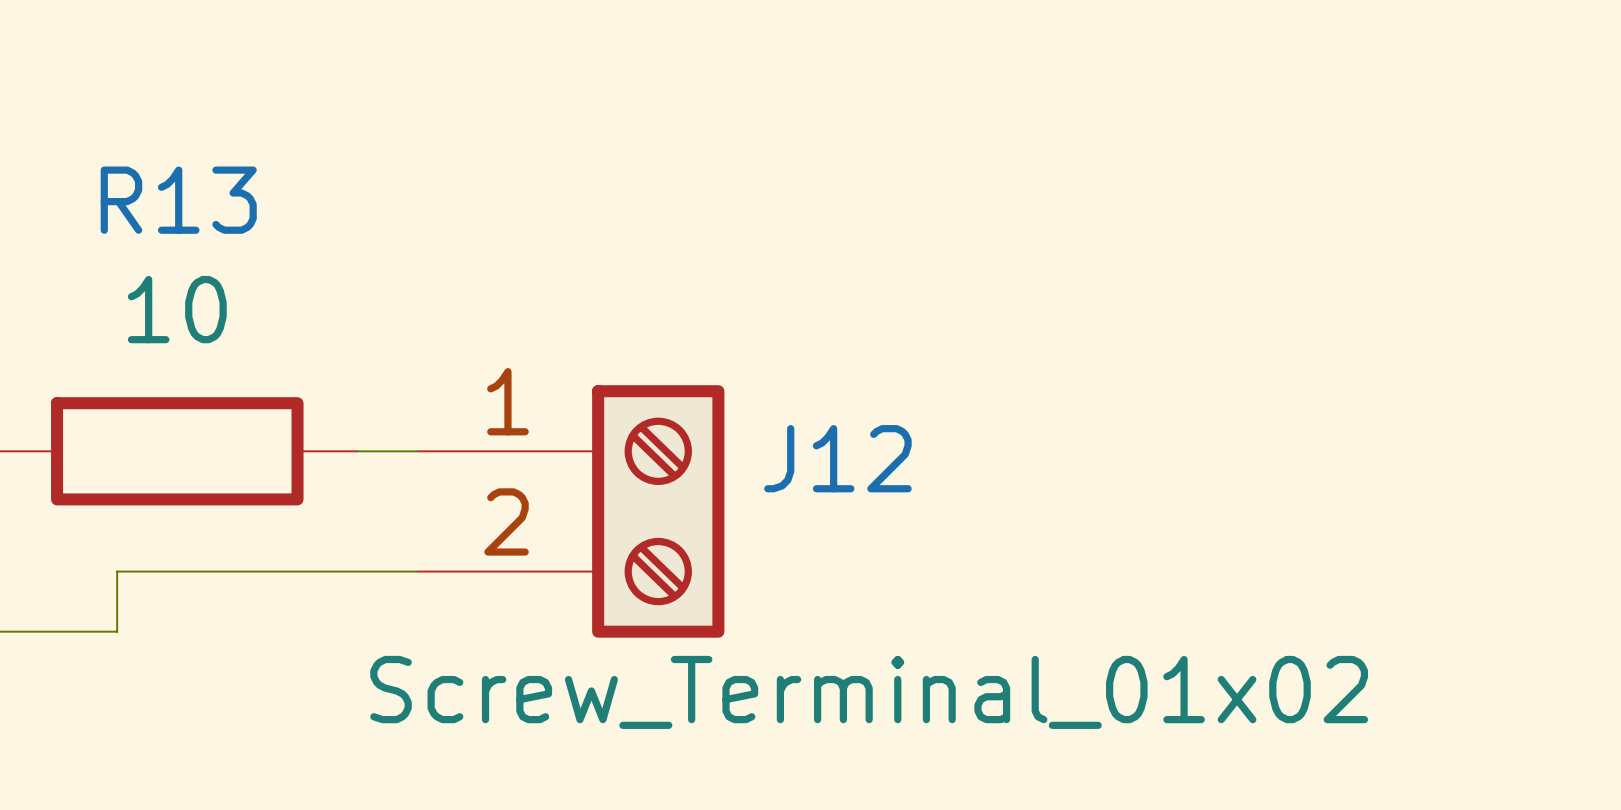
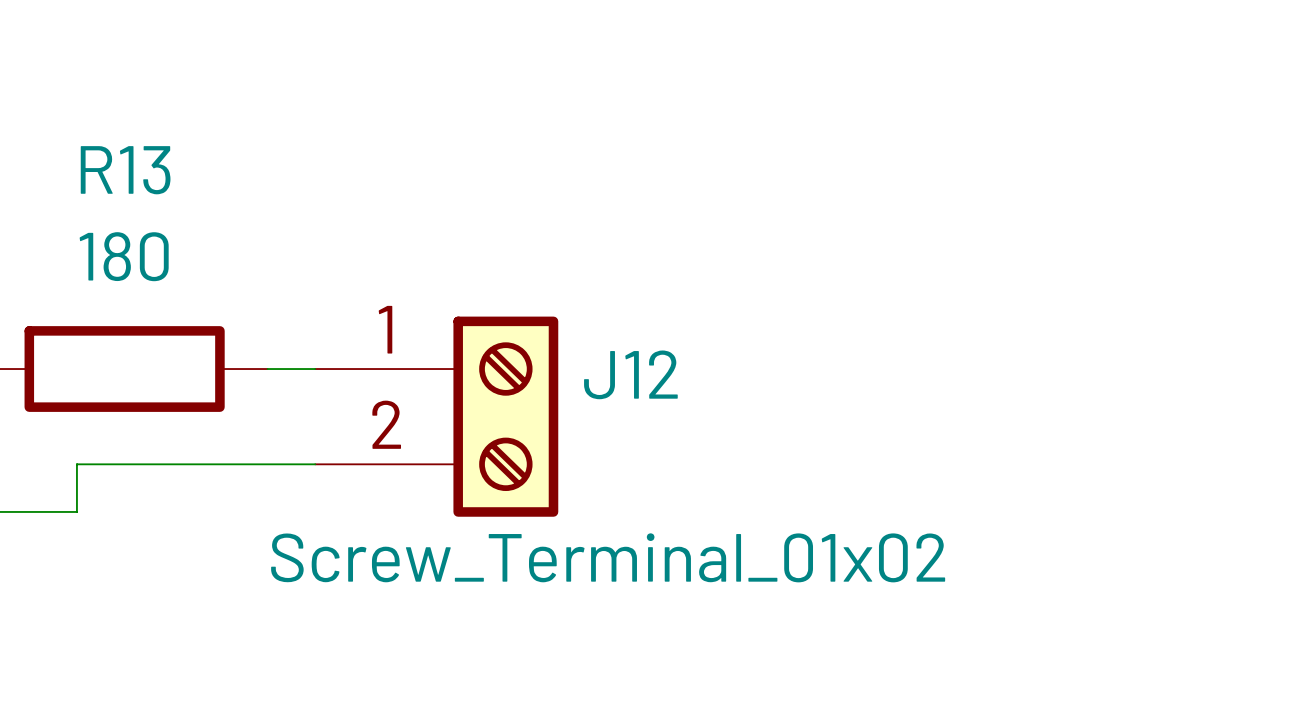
R13 value: 10 (177, 309) -> 180 (124, 256)

